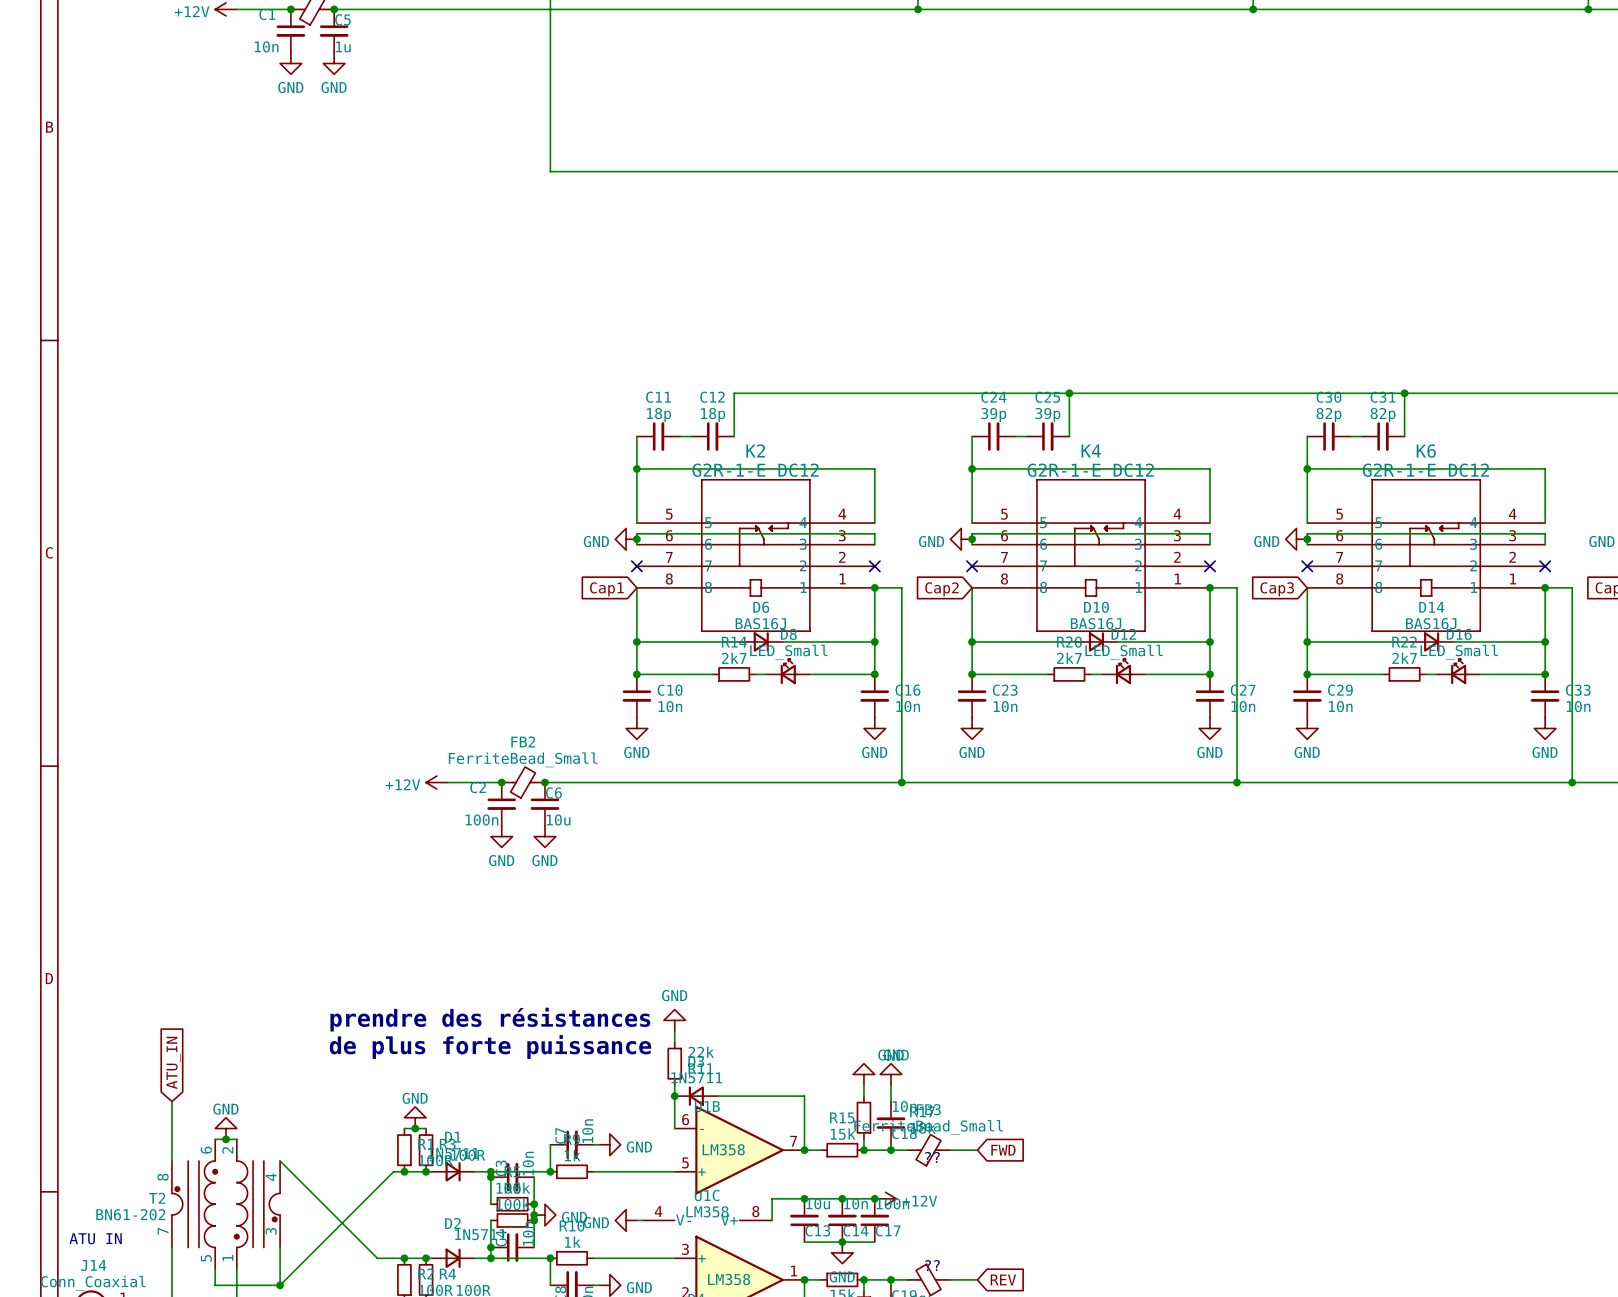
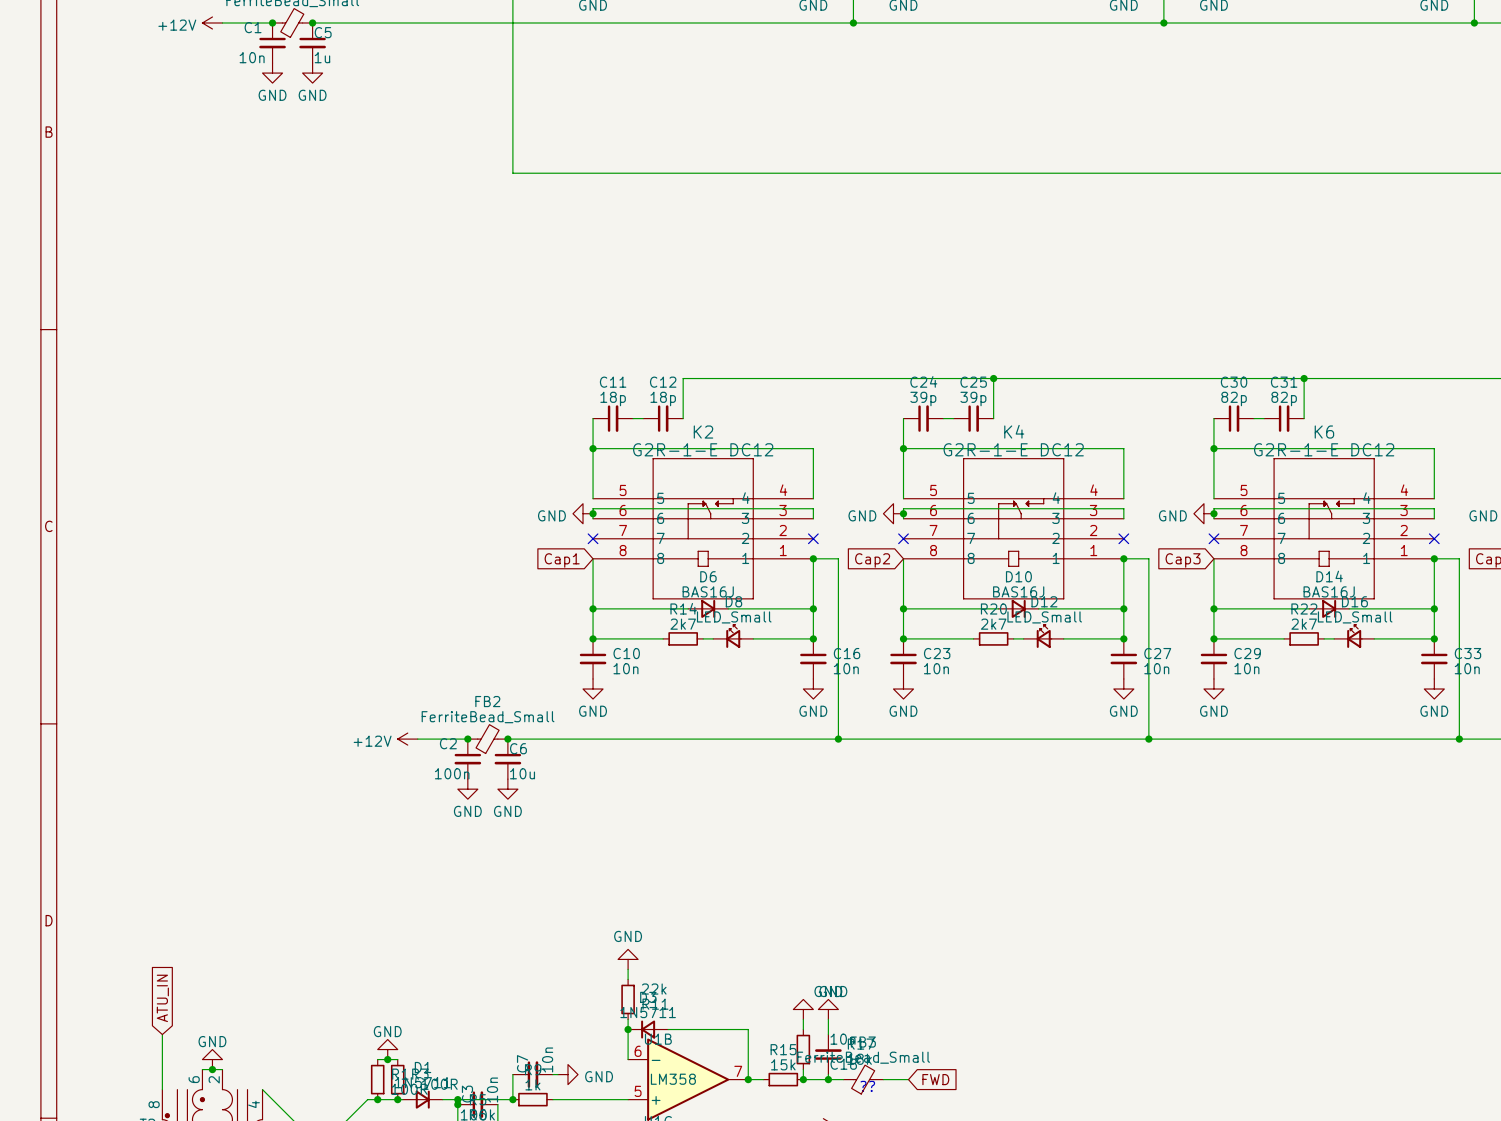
text: prendre des résistances (490, 1019) -> none
text: de plus forte puissance (490, 1046) -> none

